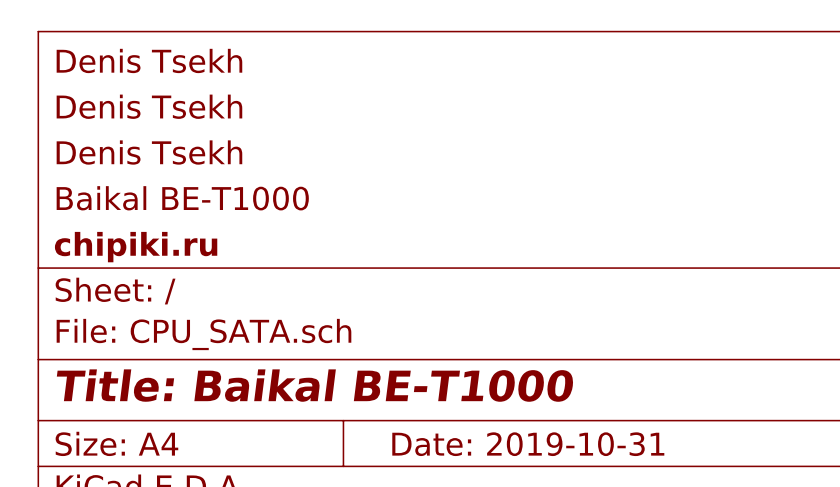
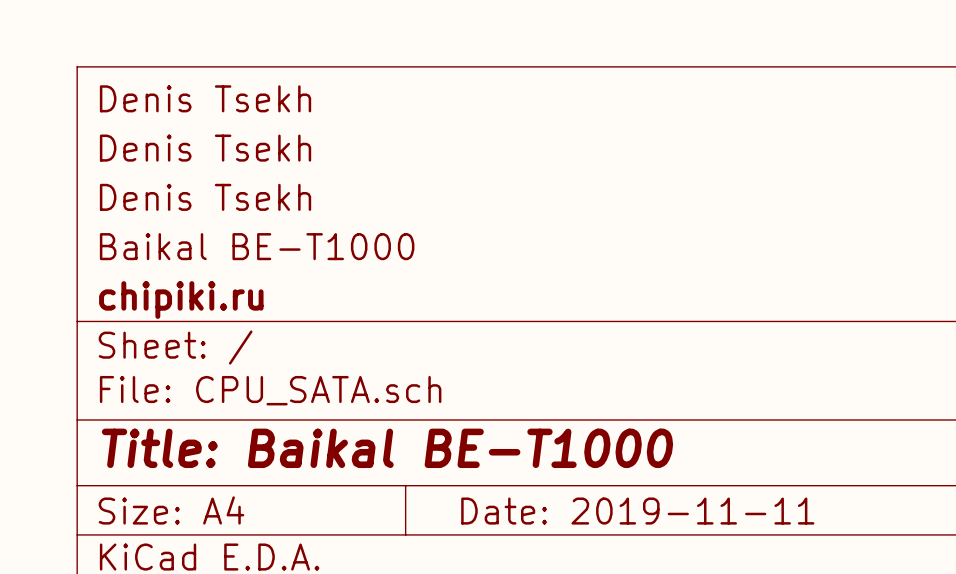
title block: Date: 2019-10-31 (528, 444) -> Date: 2019-11-11 (637, 511)

